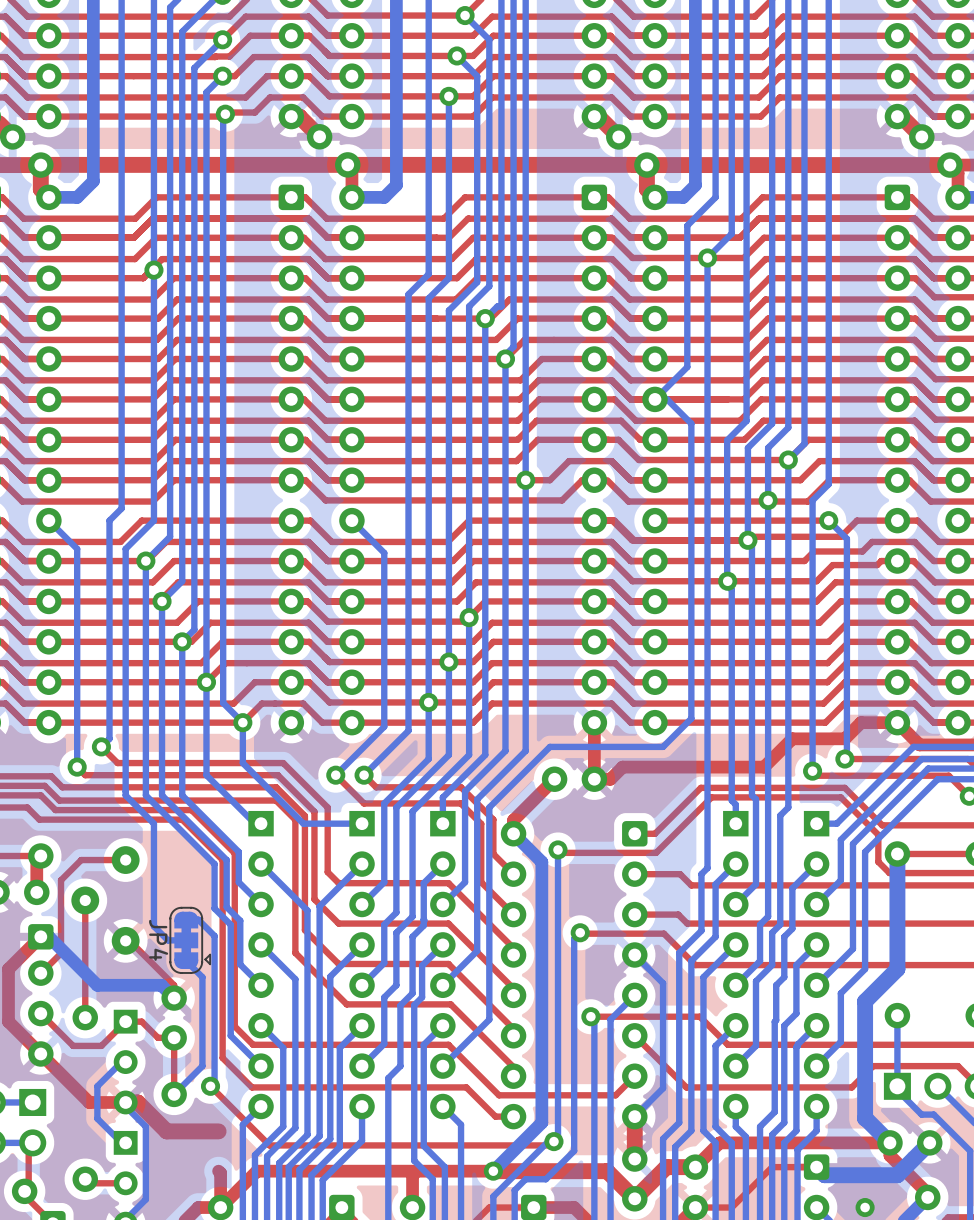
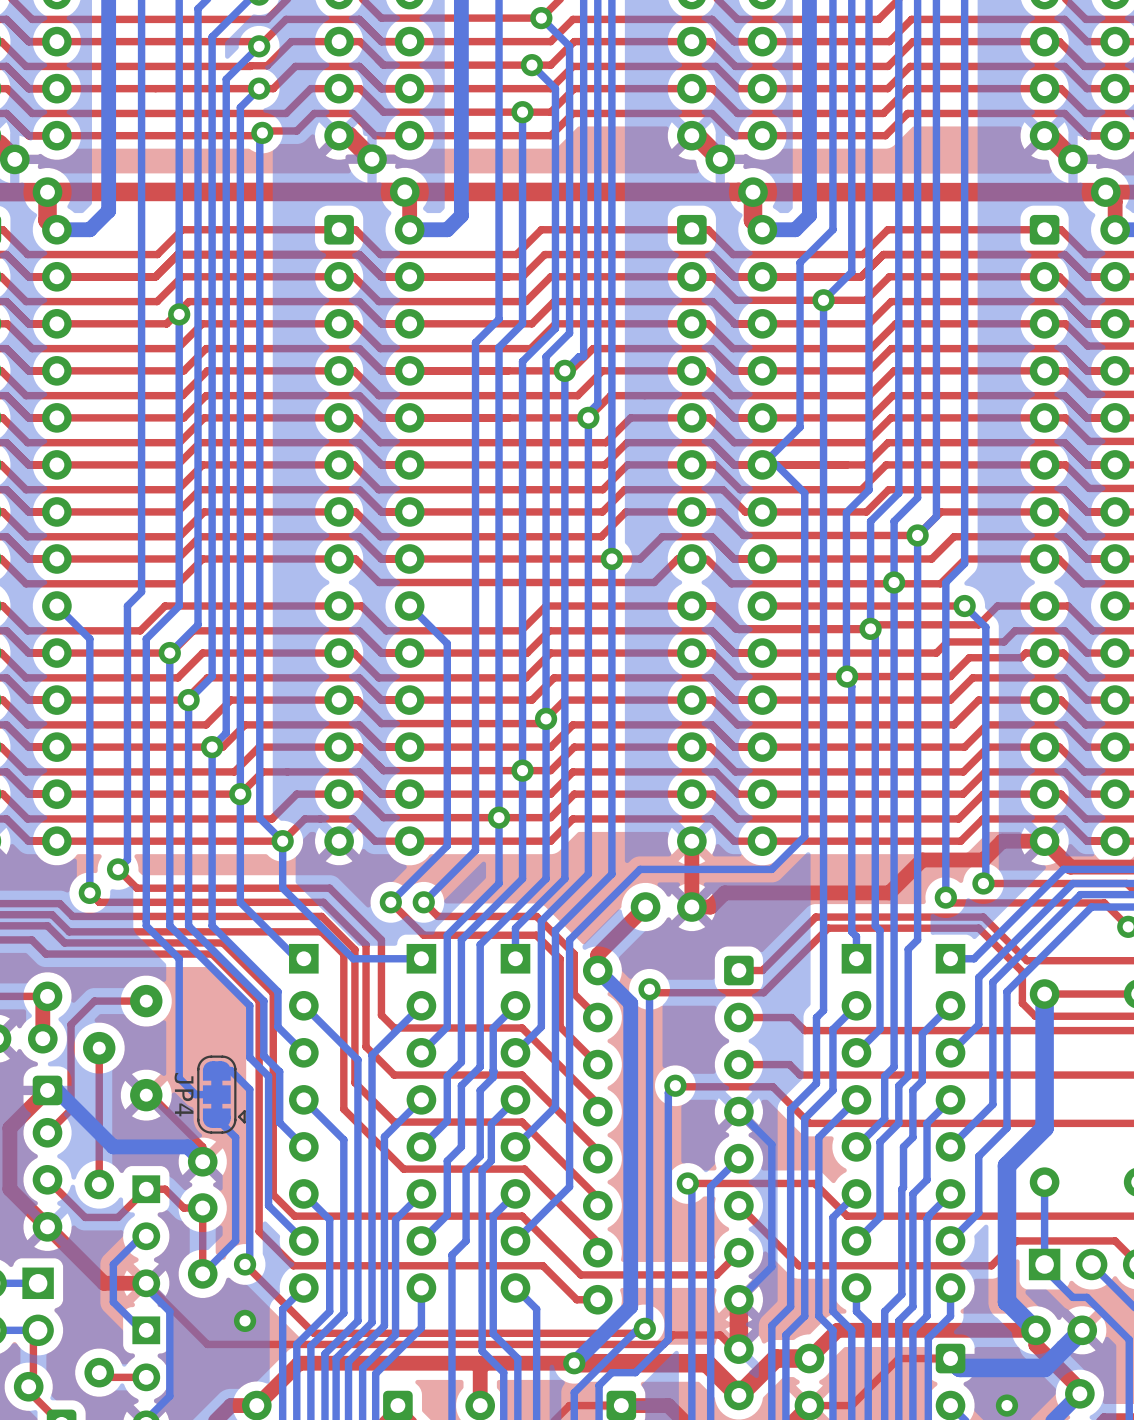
top track: (125, 1102) (137, 1102) (166, 1131) (218, 1131) -> (146, 1283) (207, 1344) (663, 1344) (673, 1335) (720, 1335) (734, 1349) (738, 1349)
via: none -> (245, 1320)
top track: (218, 1171) (220, 1173) (220, 1207) -> none

